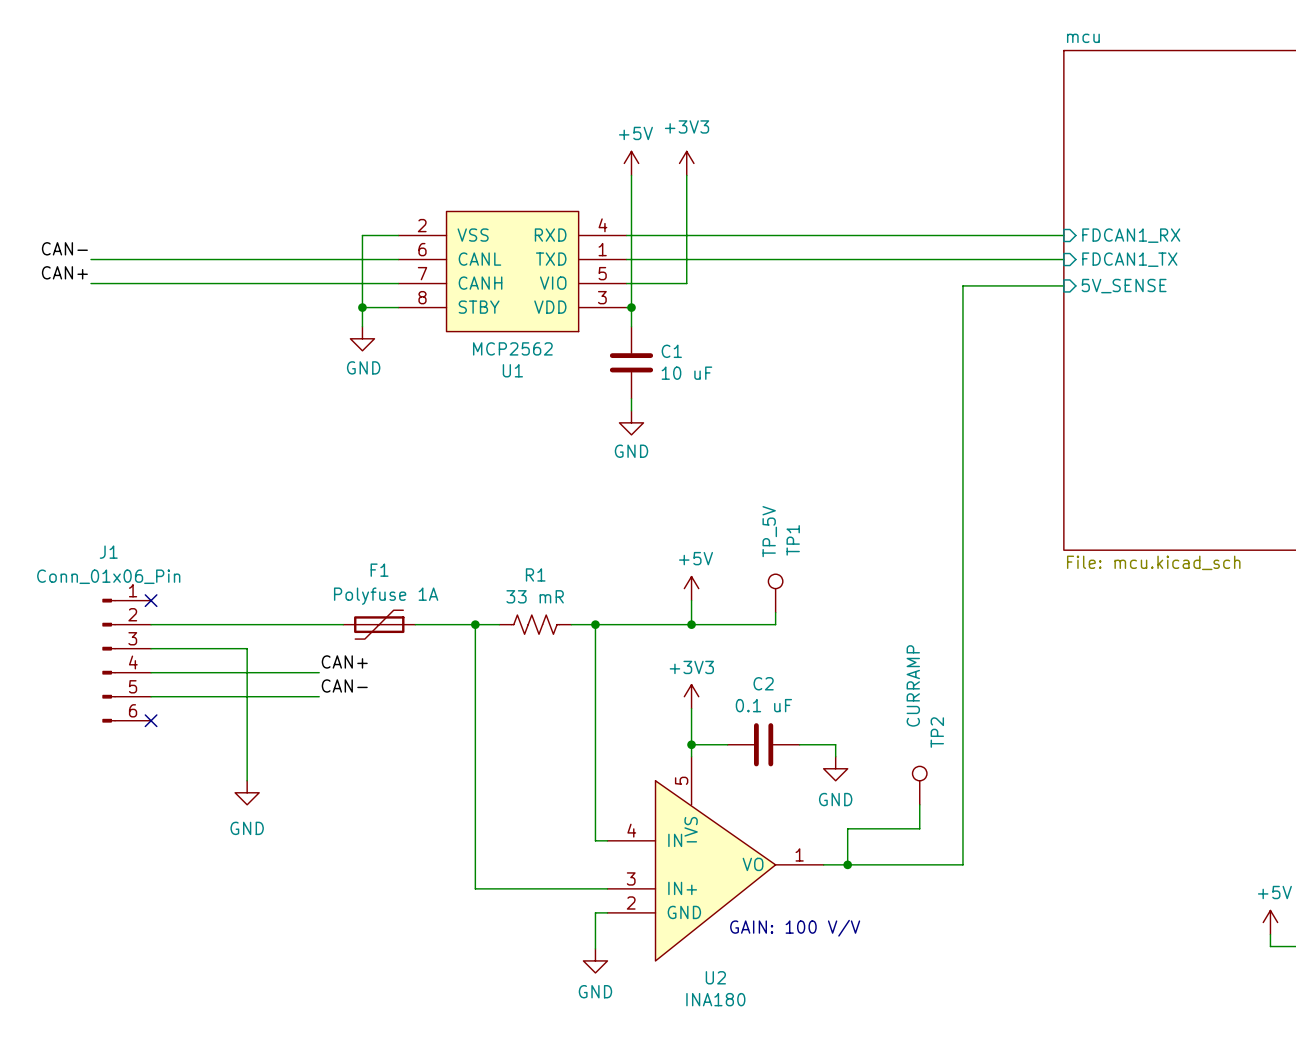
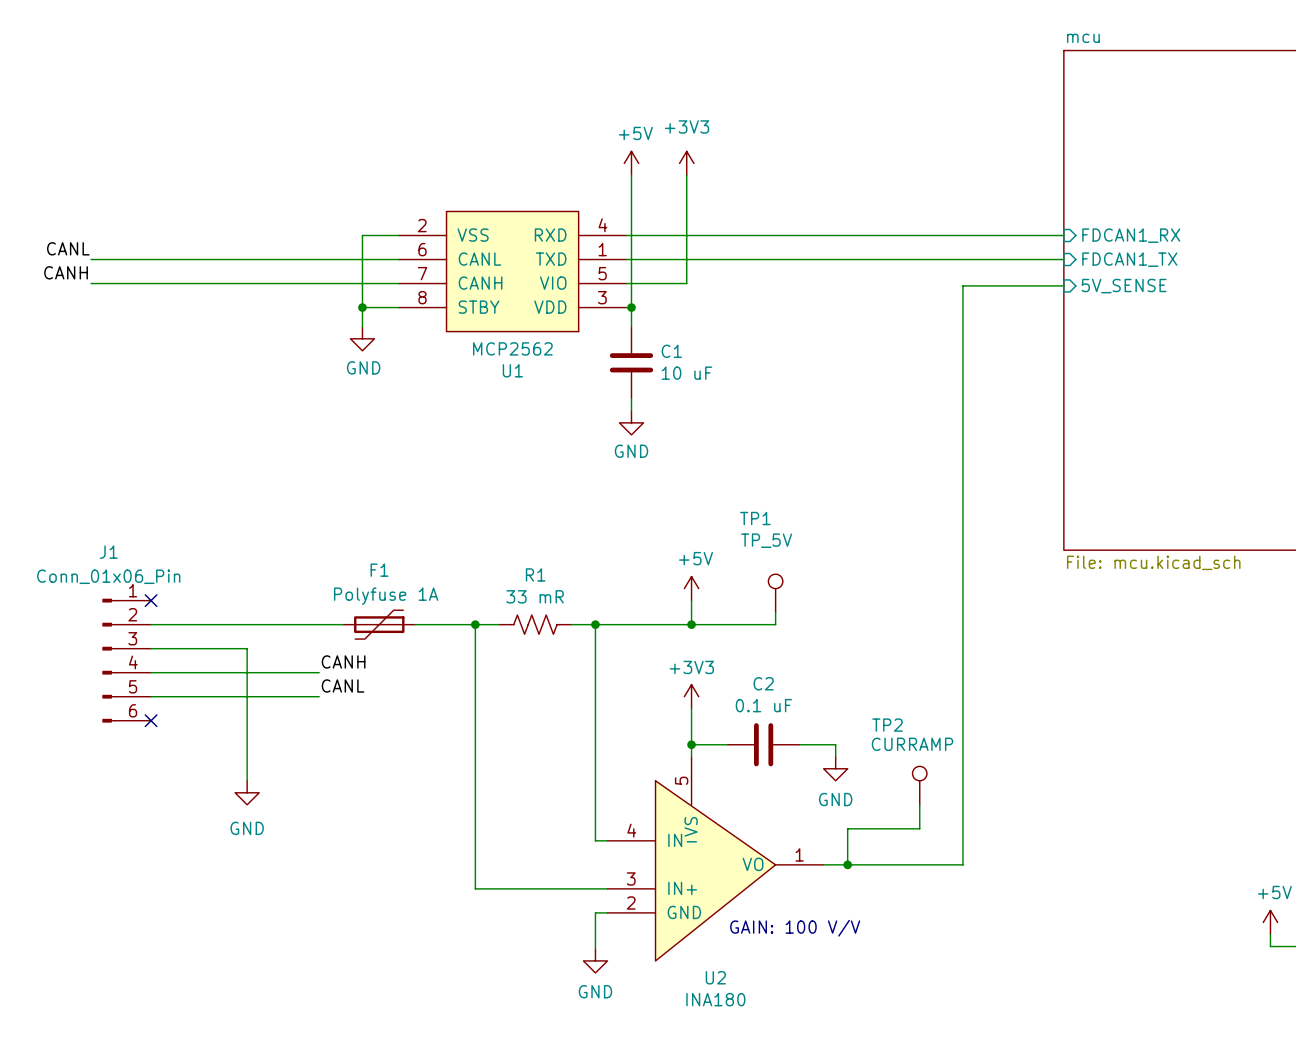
label: CAN- (64, 248) -> CANL (68, 248)
label: CAN+ (64, 272) -> CANH (66, 272)
TP1 value rotation: 0° (769, 531) -> 90° clockwise (766, 540)
TP1 name rotation: 0° (793, 540) -> 90° clockwise (755, 518)
TP1 name position: TP1 (793, 540) -> TP1 (755, 518)
label: CAN+ (344, 661) -> CANH (343, 661)
label: CAN- (344, 685) -> CANL (343, 685)
TP2 value rotation: 0° (913, 685) -> 90° clockwise (912, 744)
TP2 name rotation: 0° (937, 732) -> 90° clockwise (887, 725)
TP2 name position: TP2 (937, 732) -> TP2 (887, 725)

